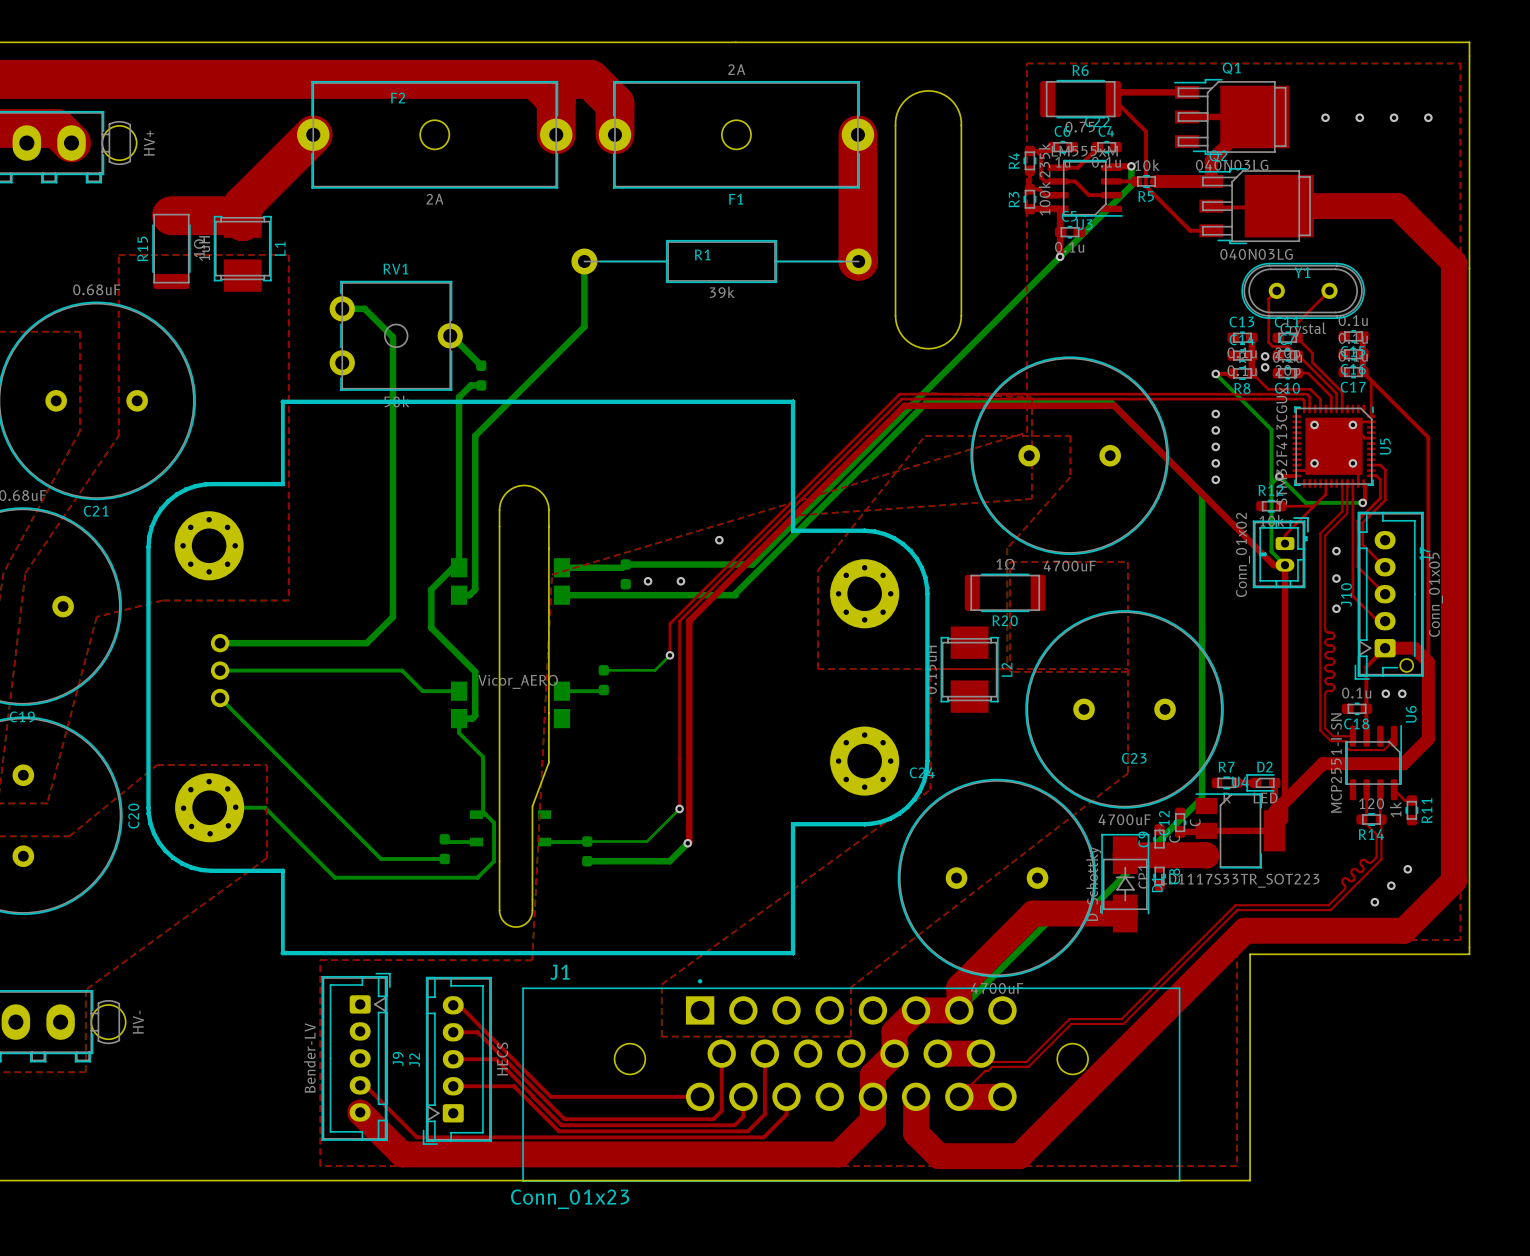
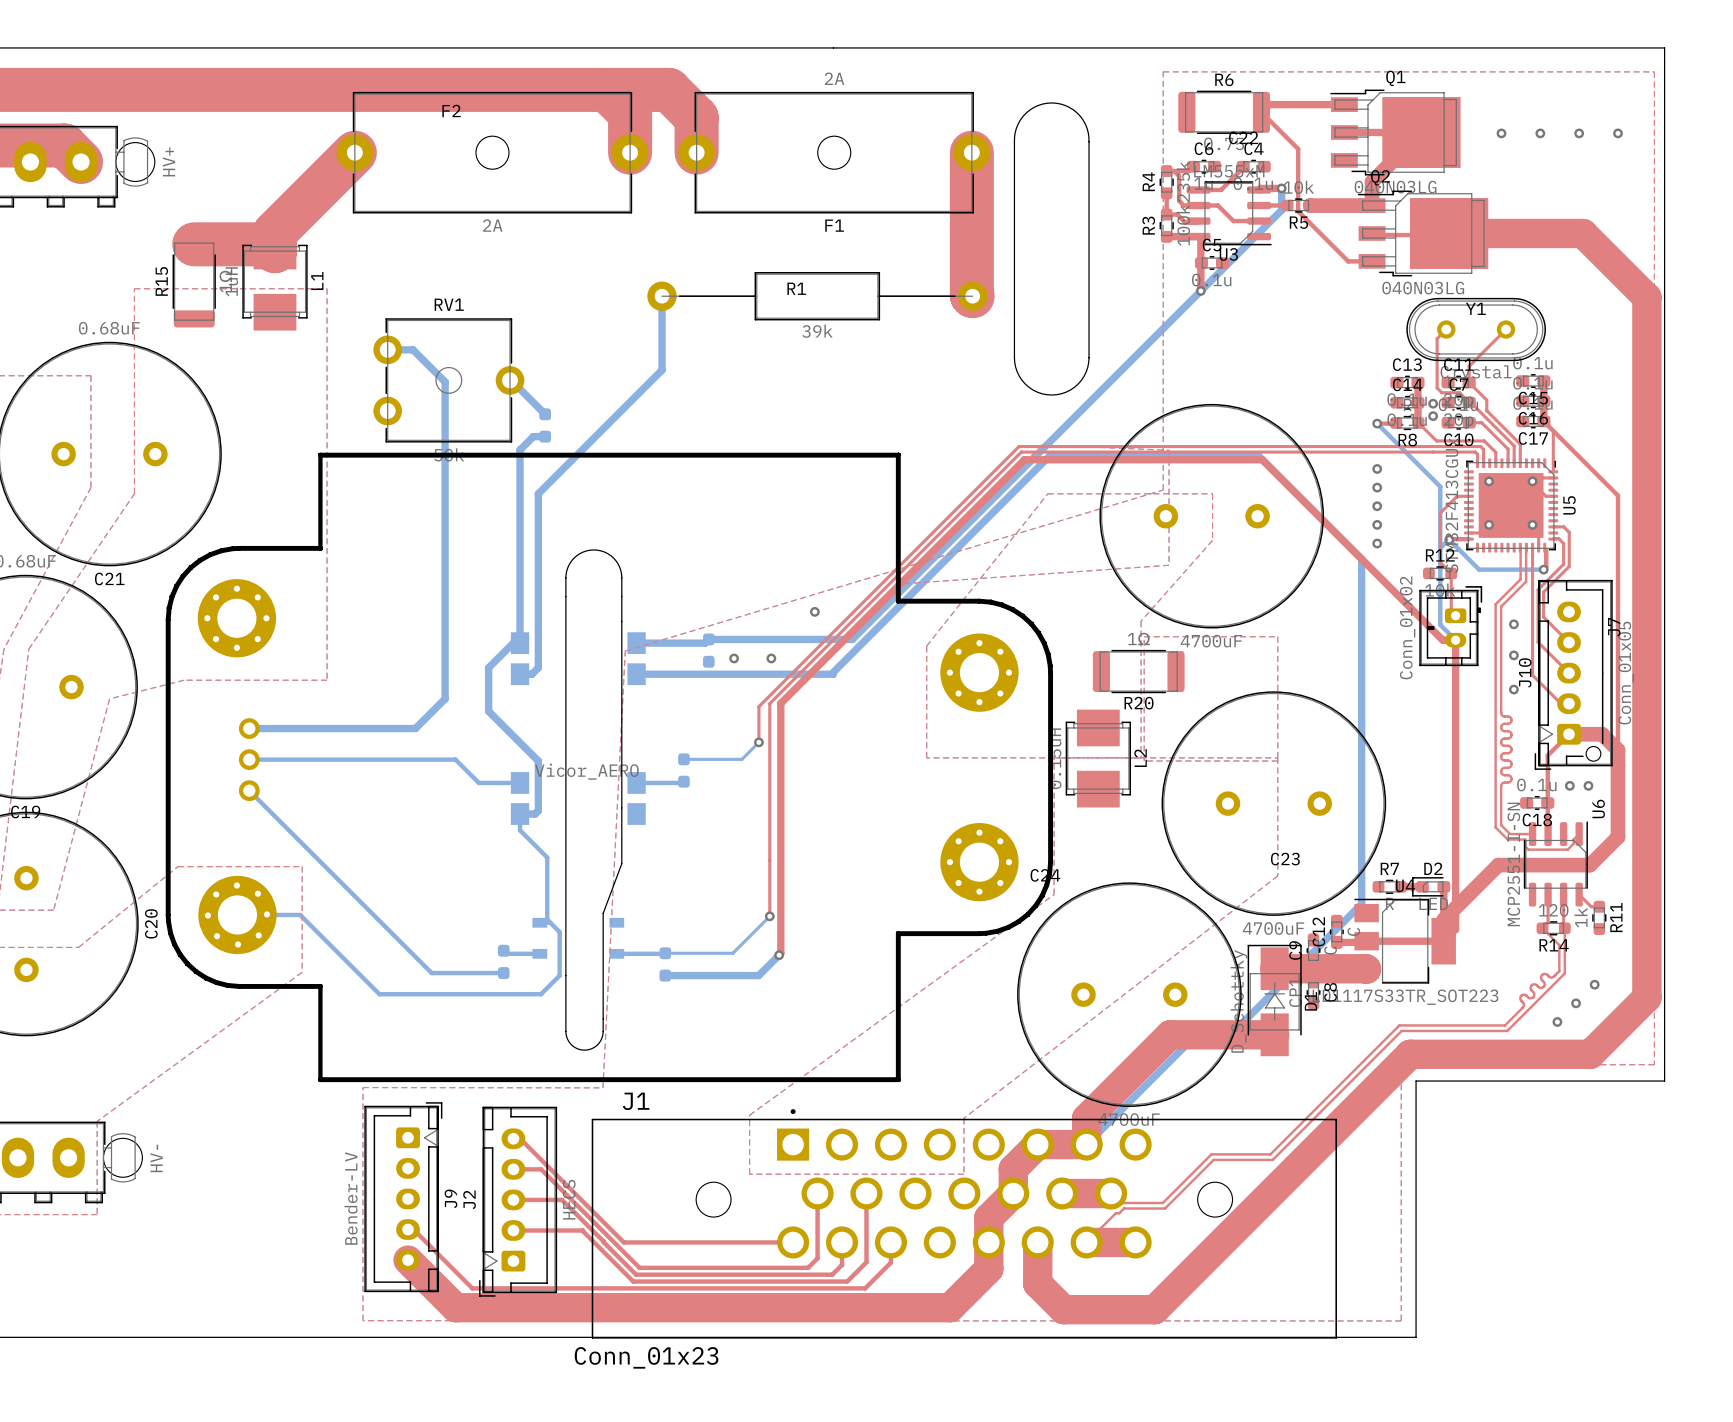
top track: (1325, 483) (1325, 494) (1285, 535) (1285, 543) -> (1468, 496) (1457, 496) (1440, 512) (1440, 562) (1451, 573) (1451, 611) (1455, 615)
top track: (1281, 506) (1313, 506) -> none

